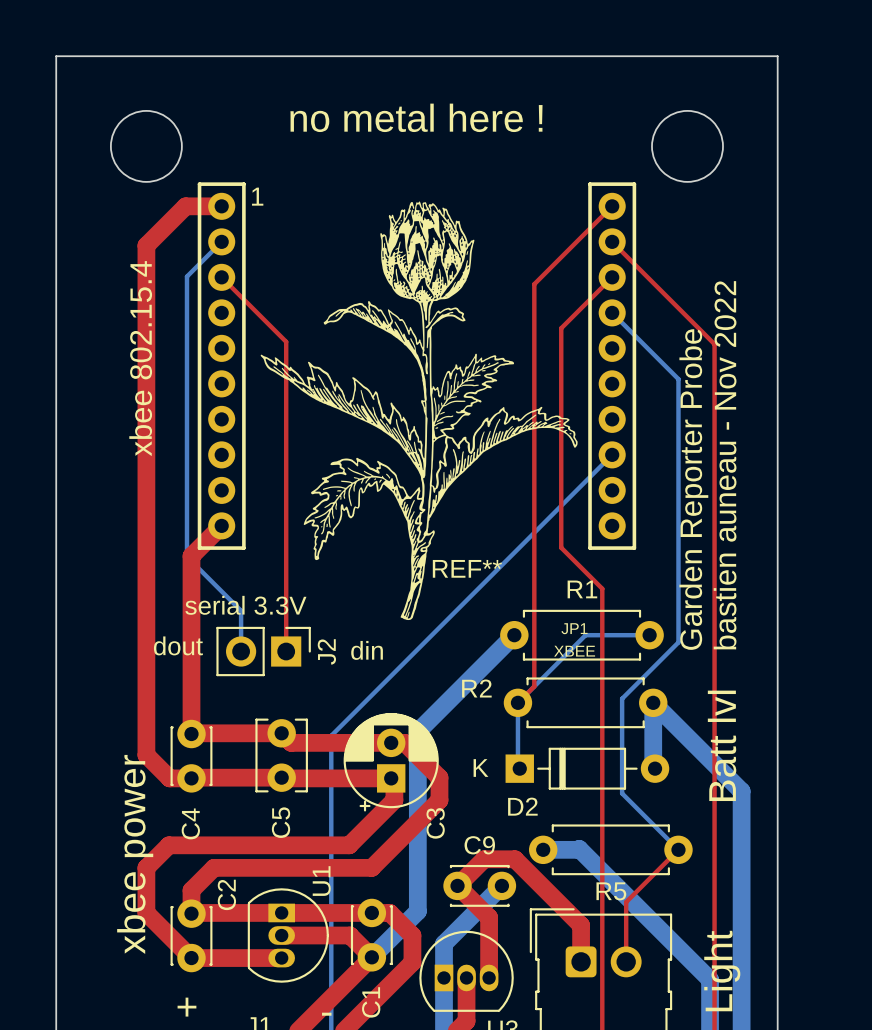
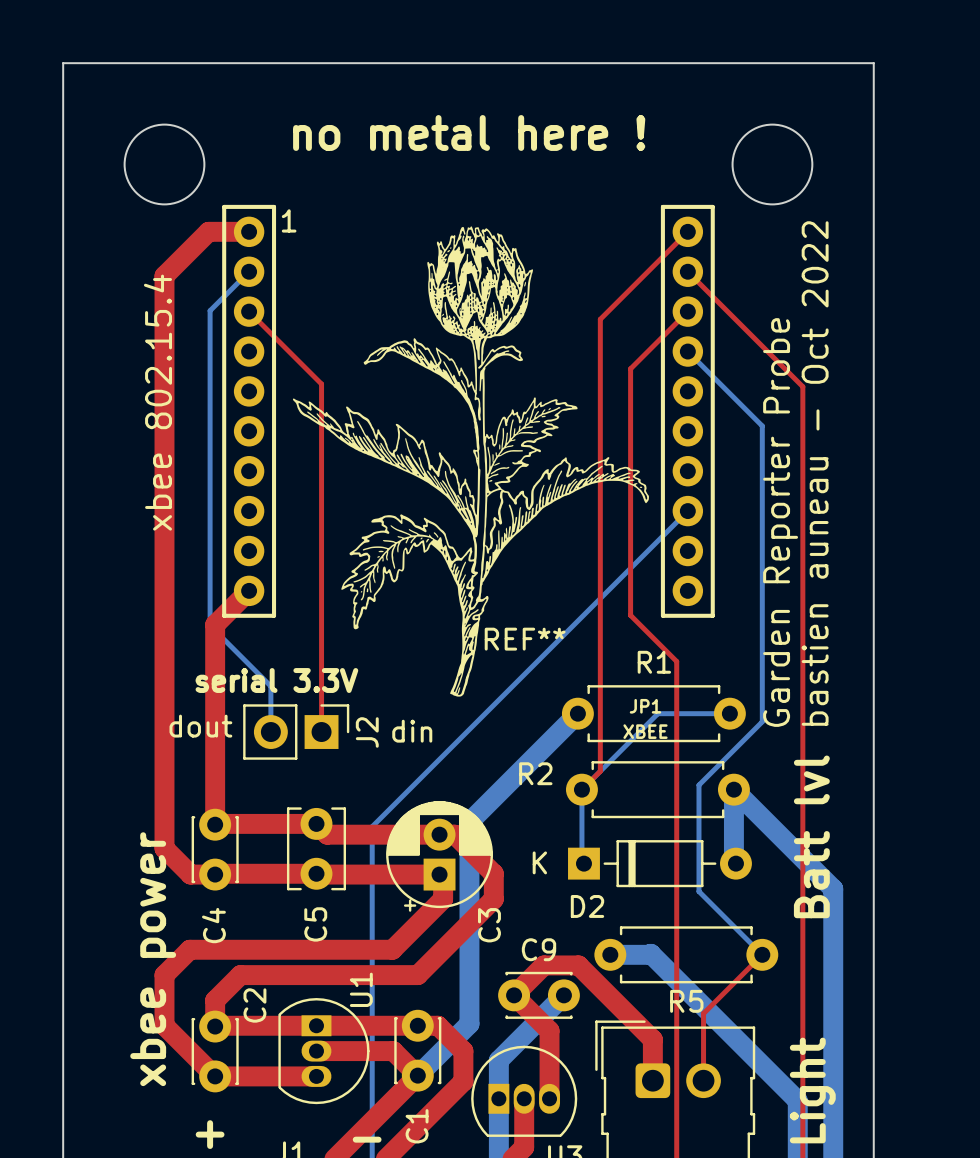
text: bastien auneau - Nov 2022 (725, 465) -> bastien auneau - Oct 2022 (815, 473)

